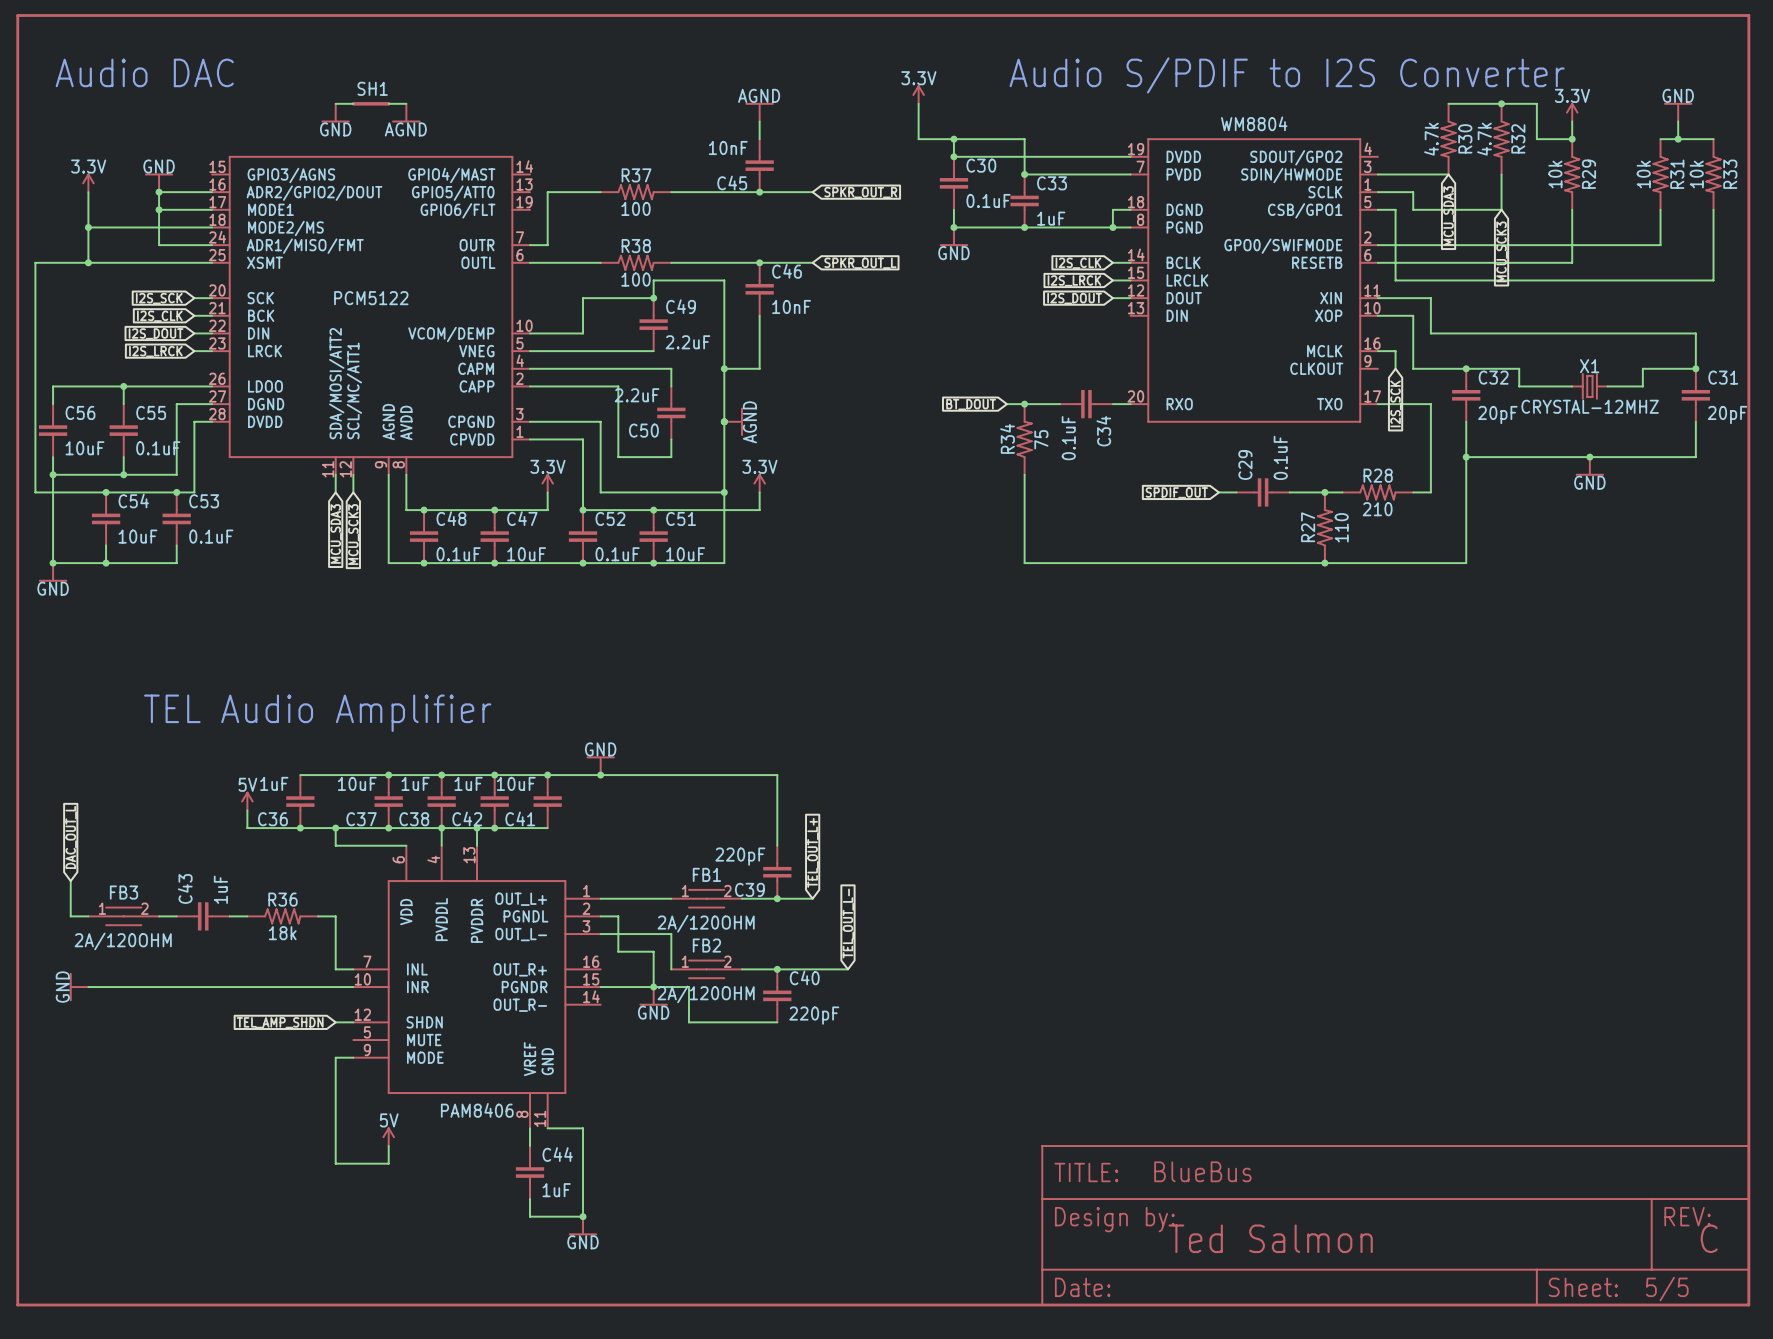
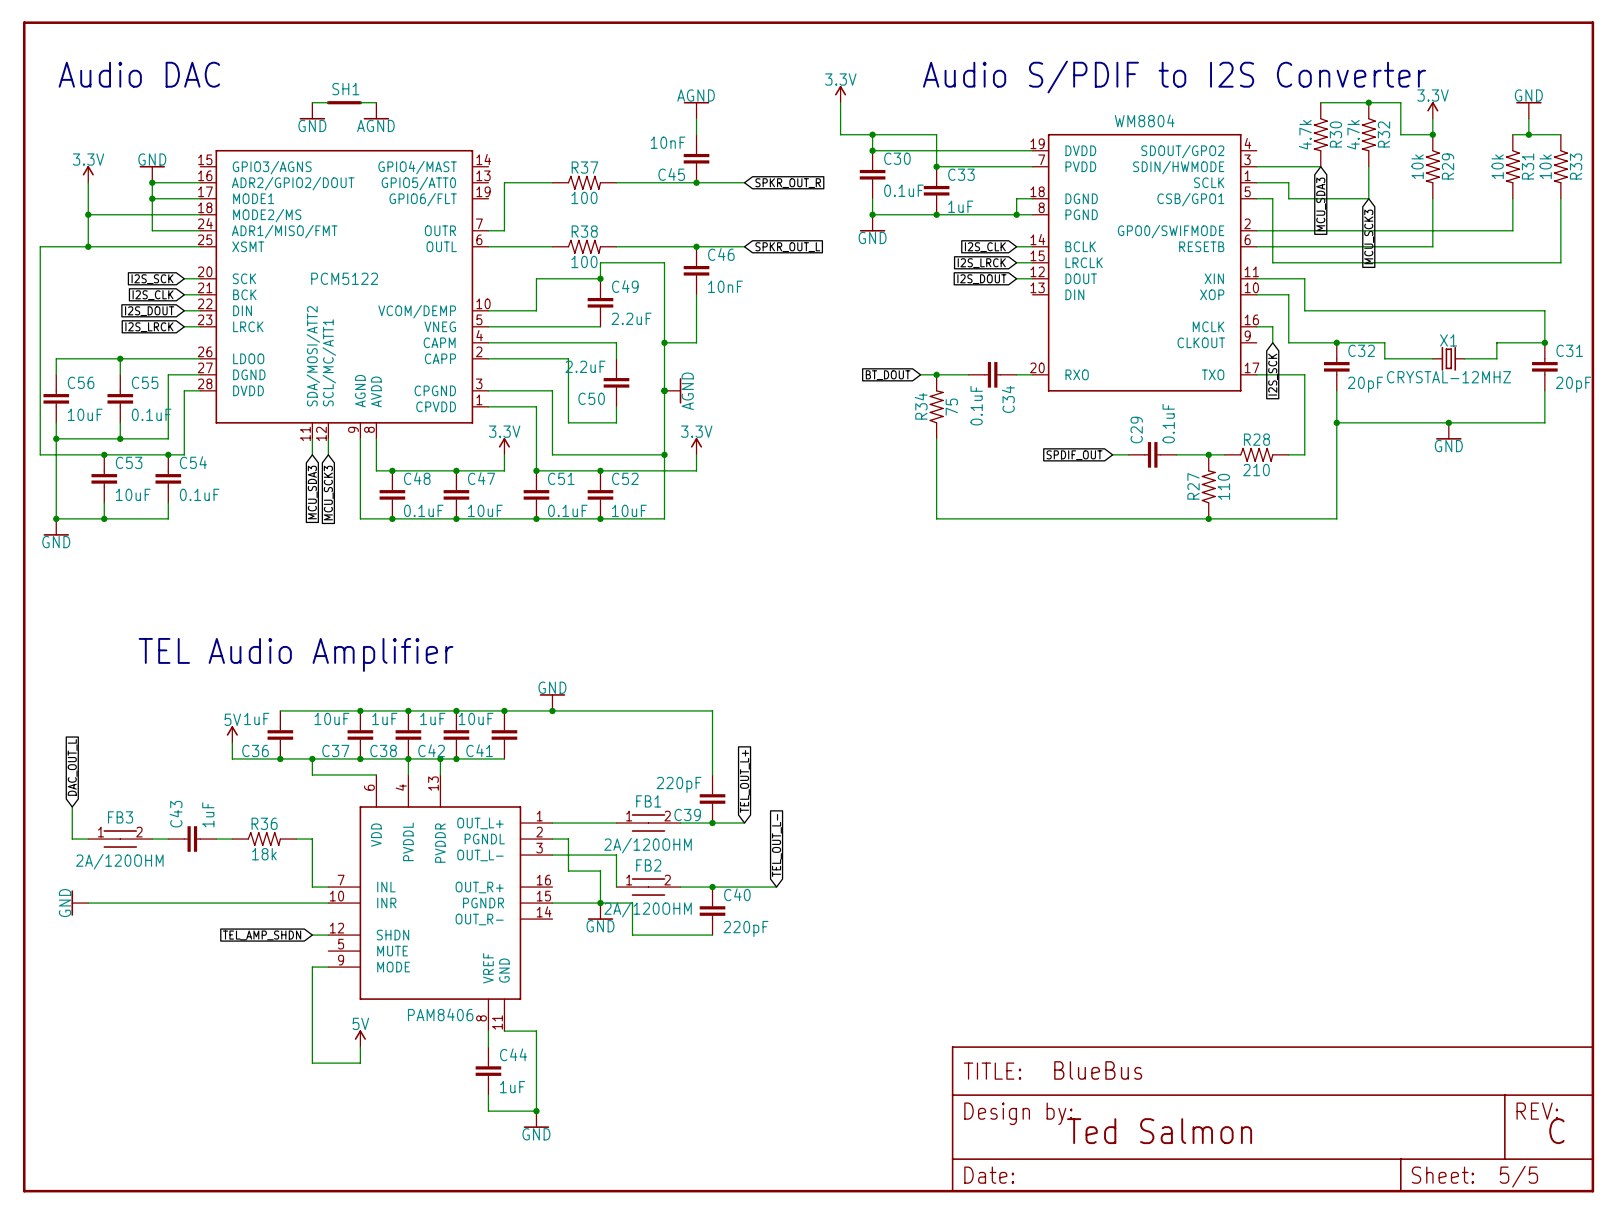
C54 name: C54 (133, 500) -> C53 (129, 462)
C53 name: C53 (204, 501) -> C54 (193, 462)
C52 name: C52 (610, 518) -> C51 (561, 478)
C51 name: C51 (681, 518) -> C52 (625, 478)

